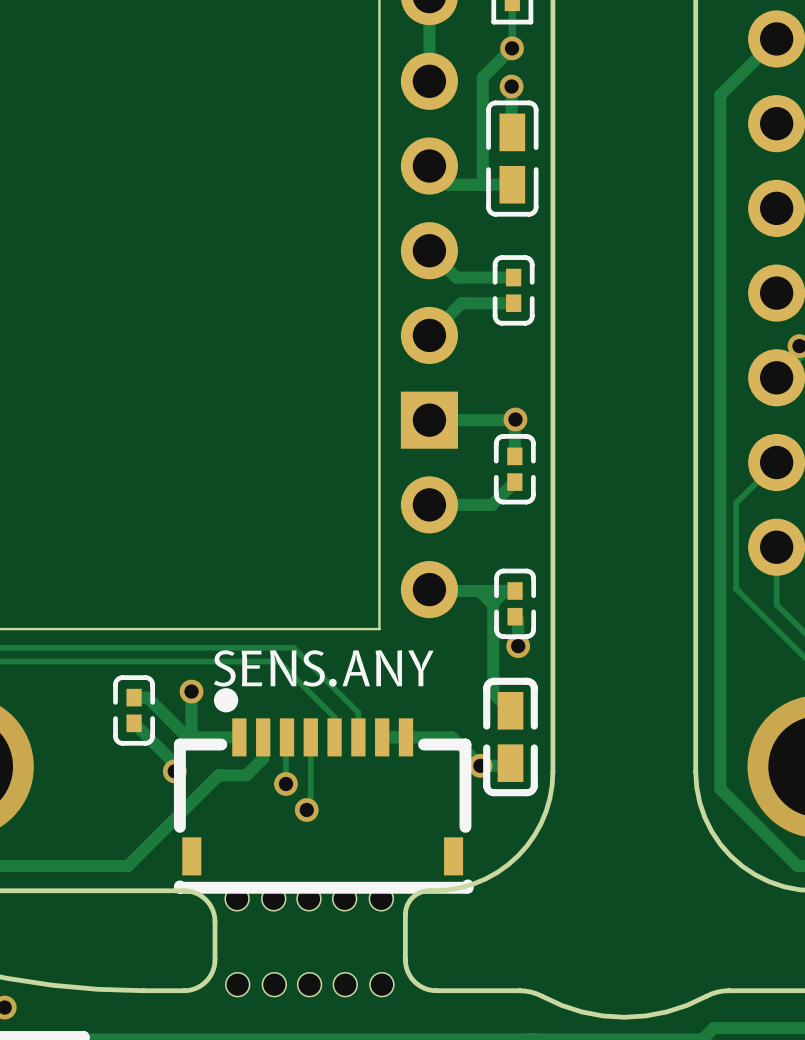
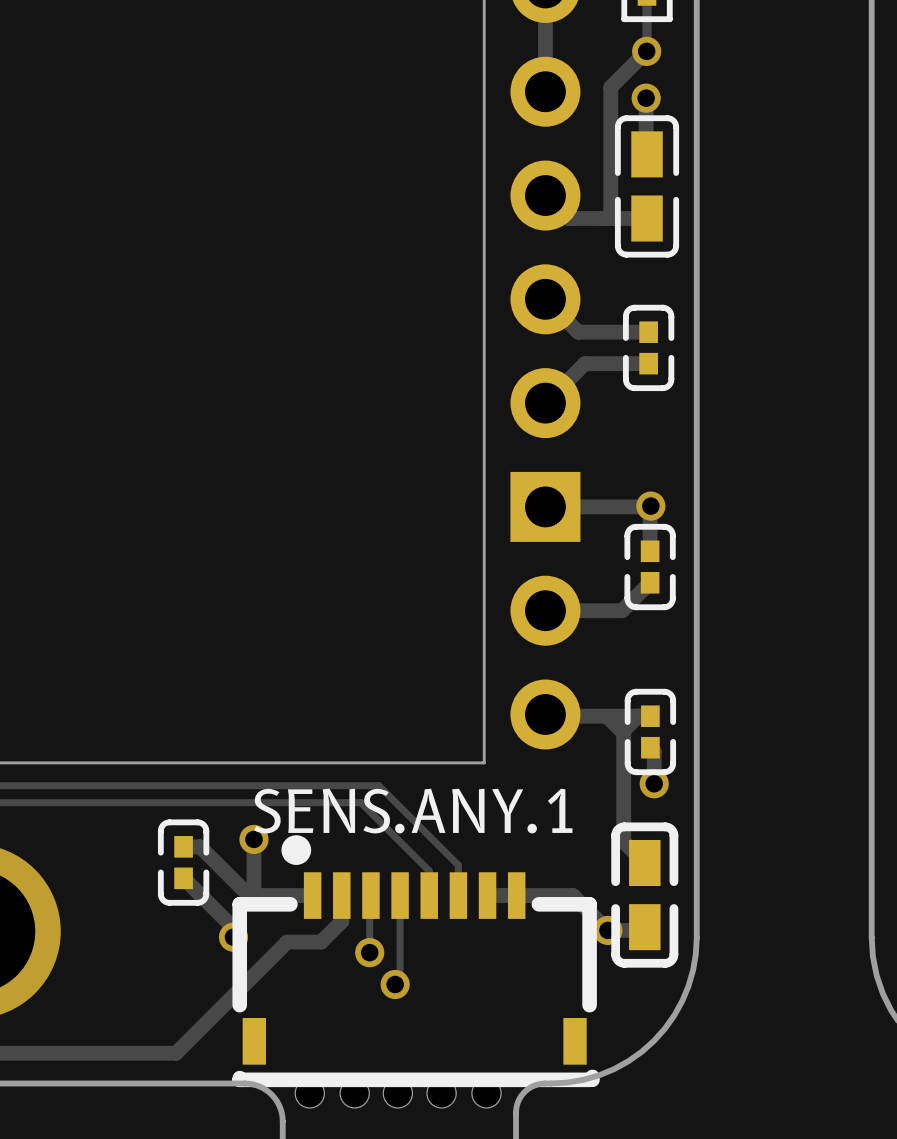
SENS.ANY name: SENS.ANY (323, 668) -> SENS.ANY.1 (413, 811)

